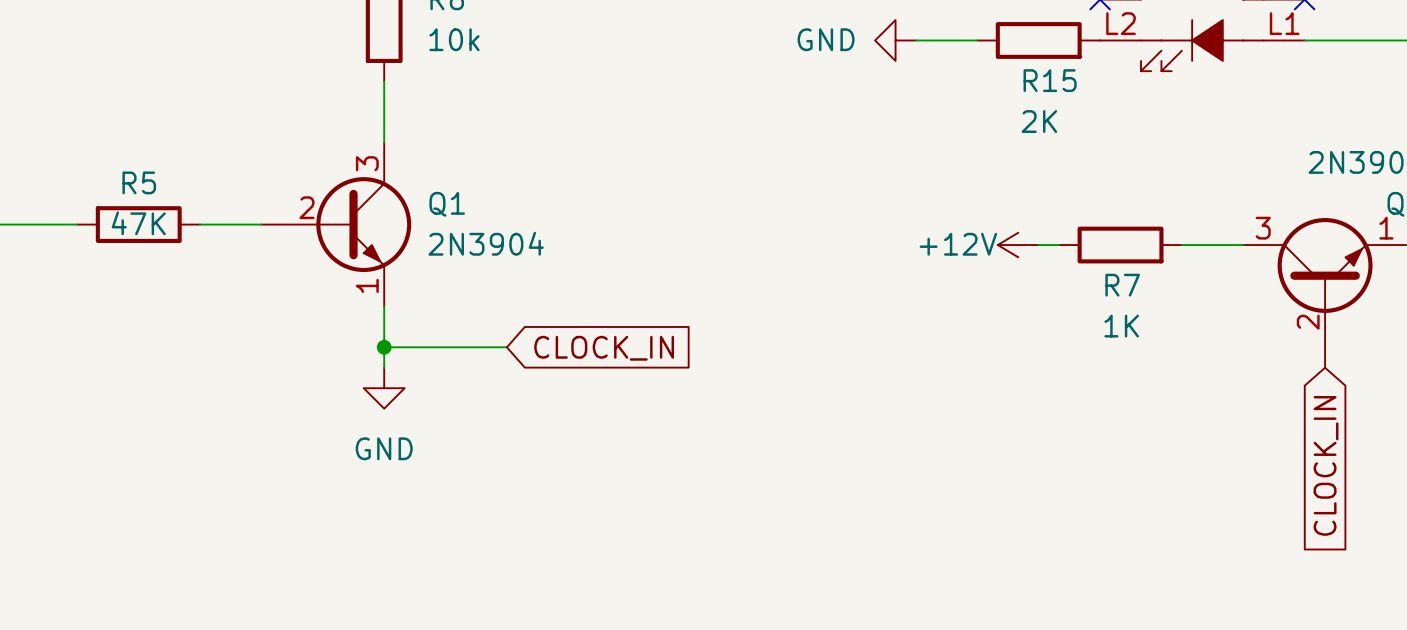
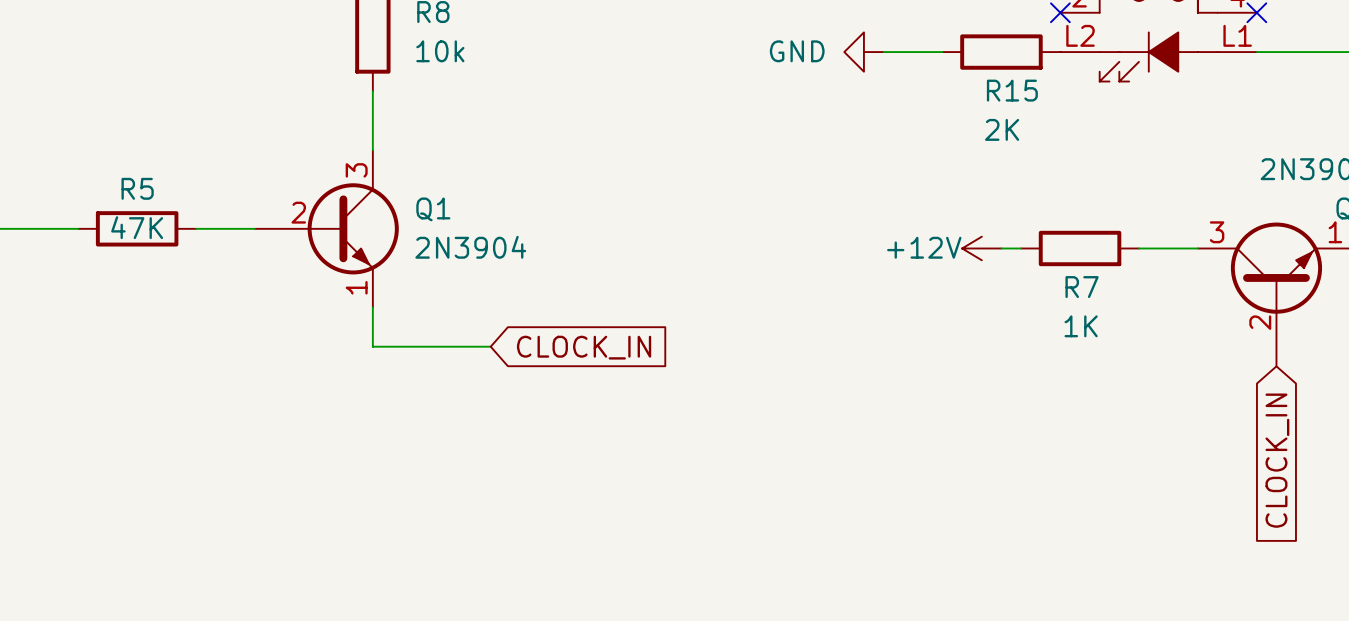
wire: (384, 347) (384, 367) -> none
junction: (384, 347) -> none
power symbol: GND (384, 388) -> none

